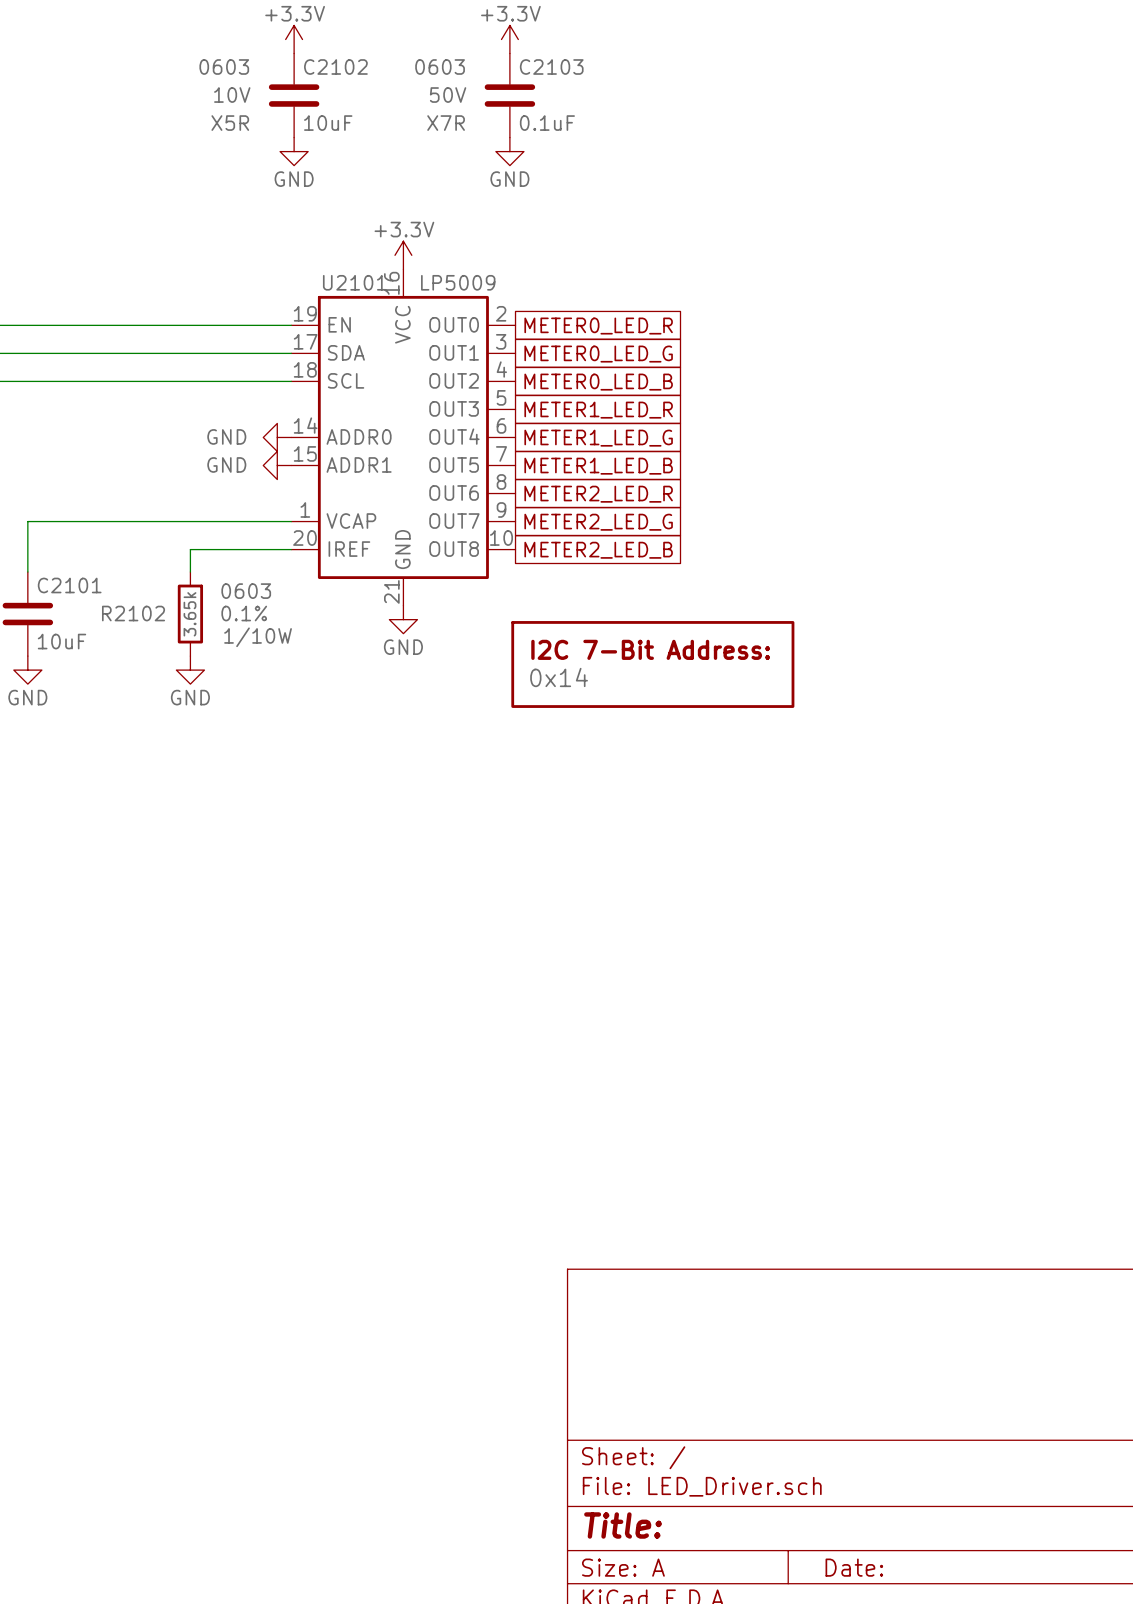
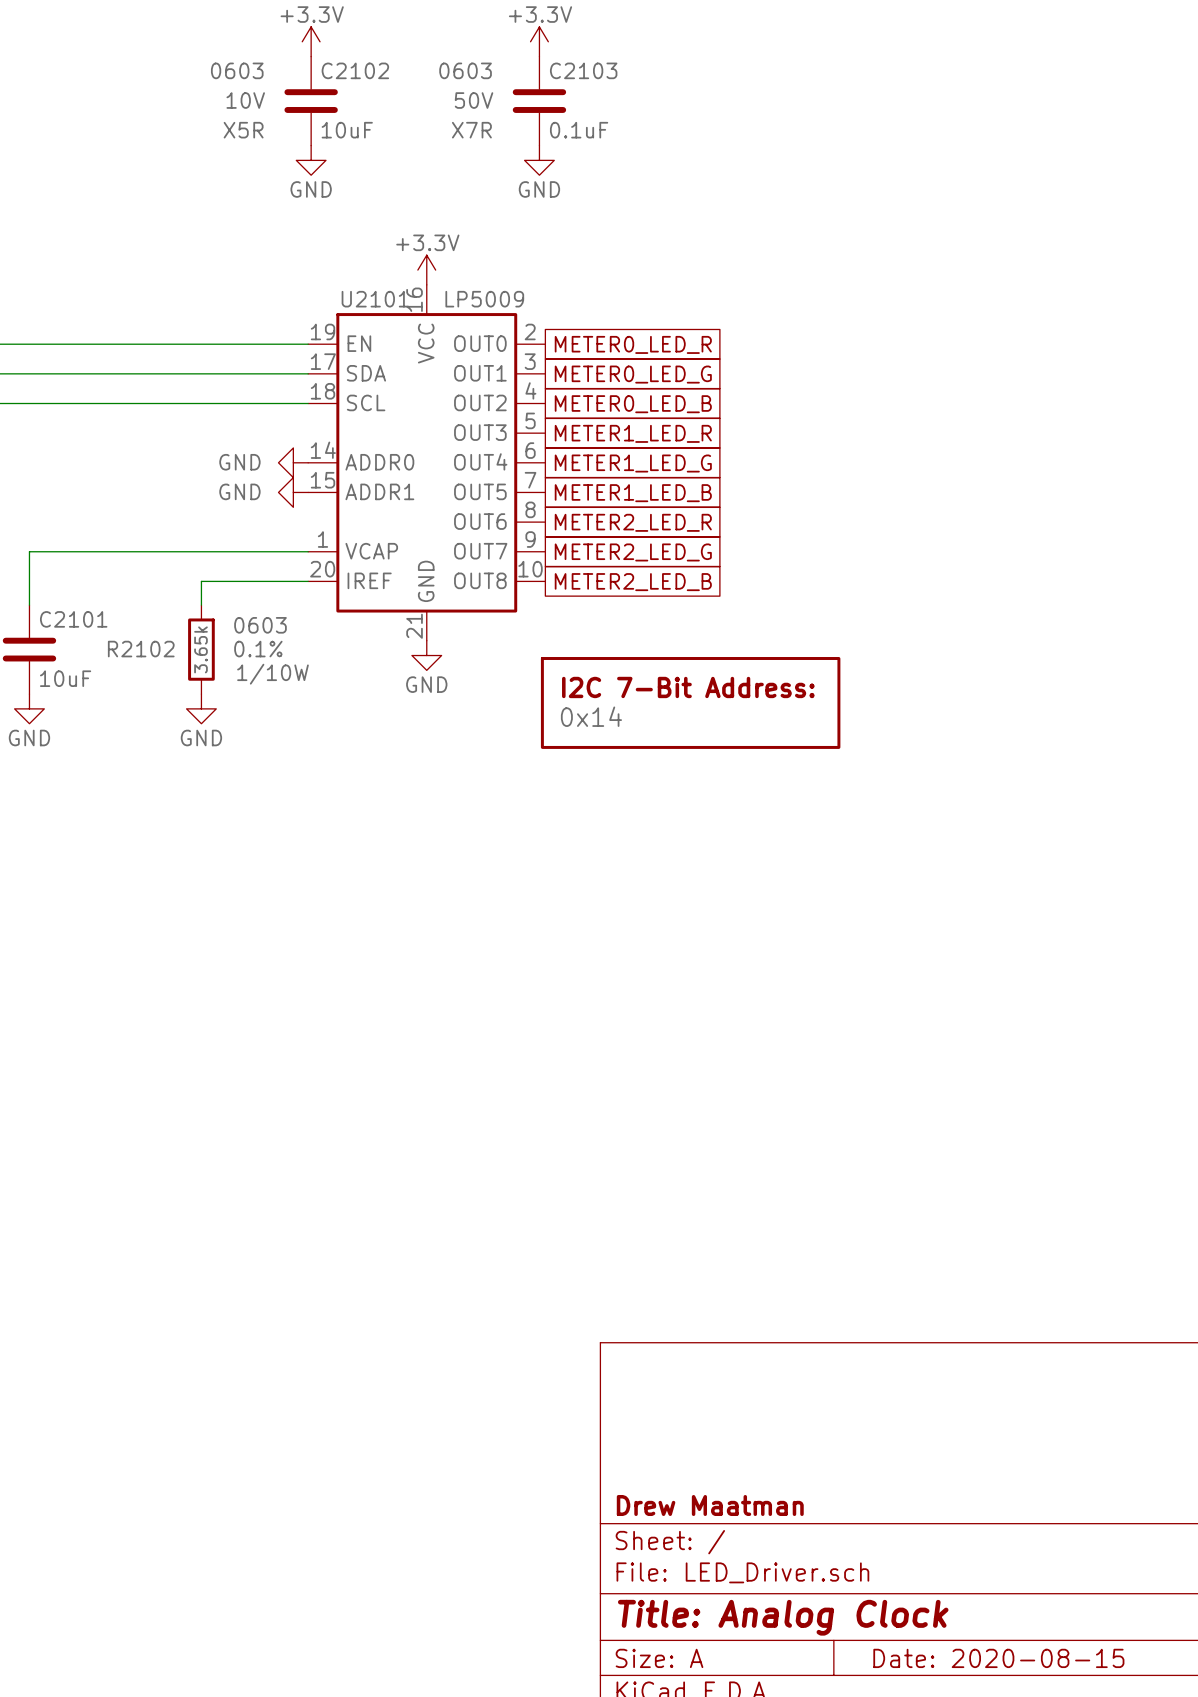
title block: none -> Drew Maatman (710, 1505)
title block: Title: (623, 1525) -> Title: Analog Clock (783, 1617)
title block: Date: (854, 1567) -> Date: 2020-08-15 (998, 1658)

